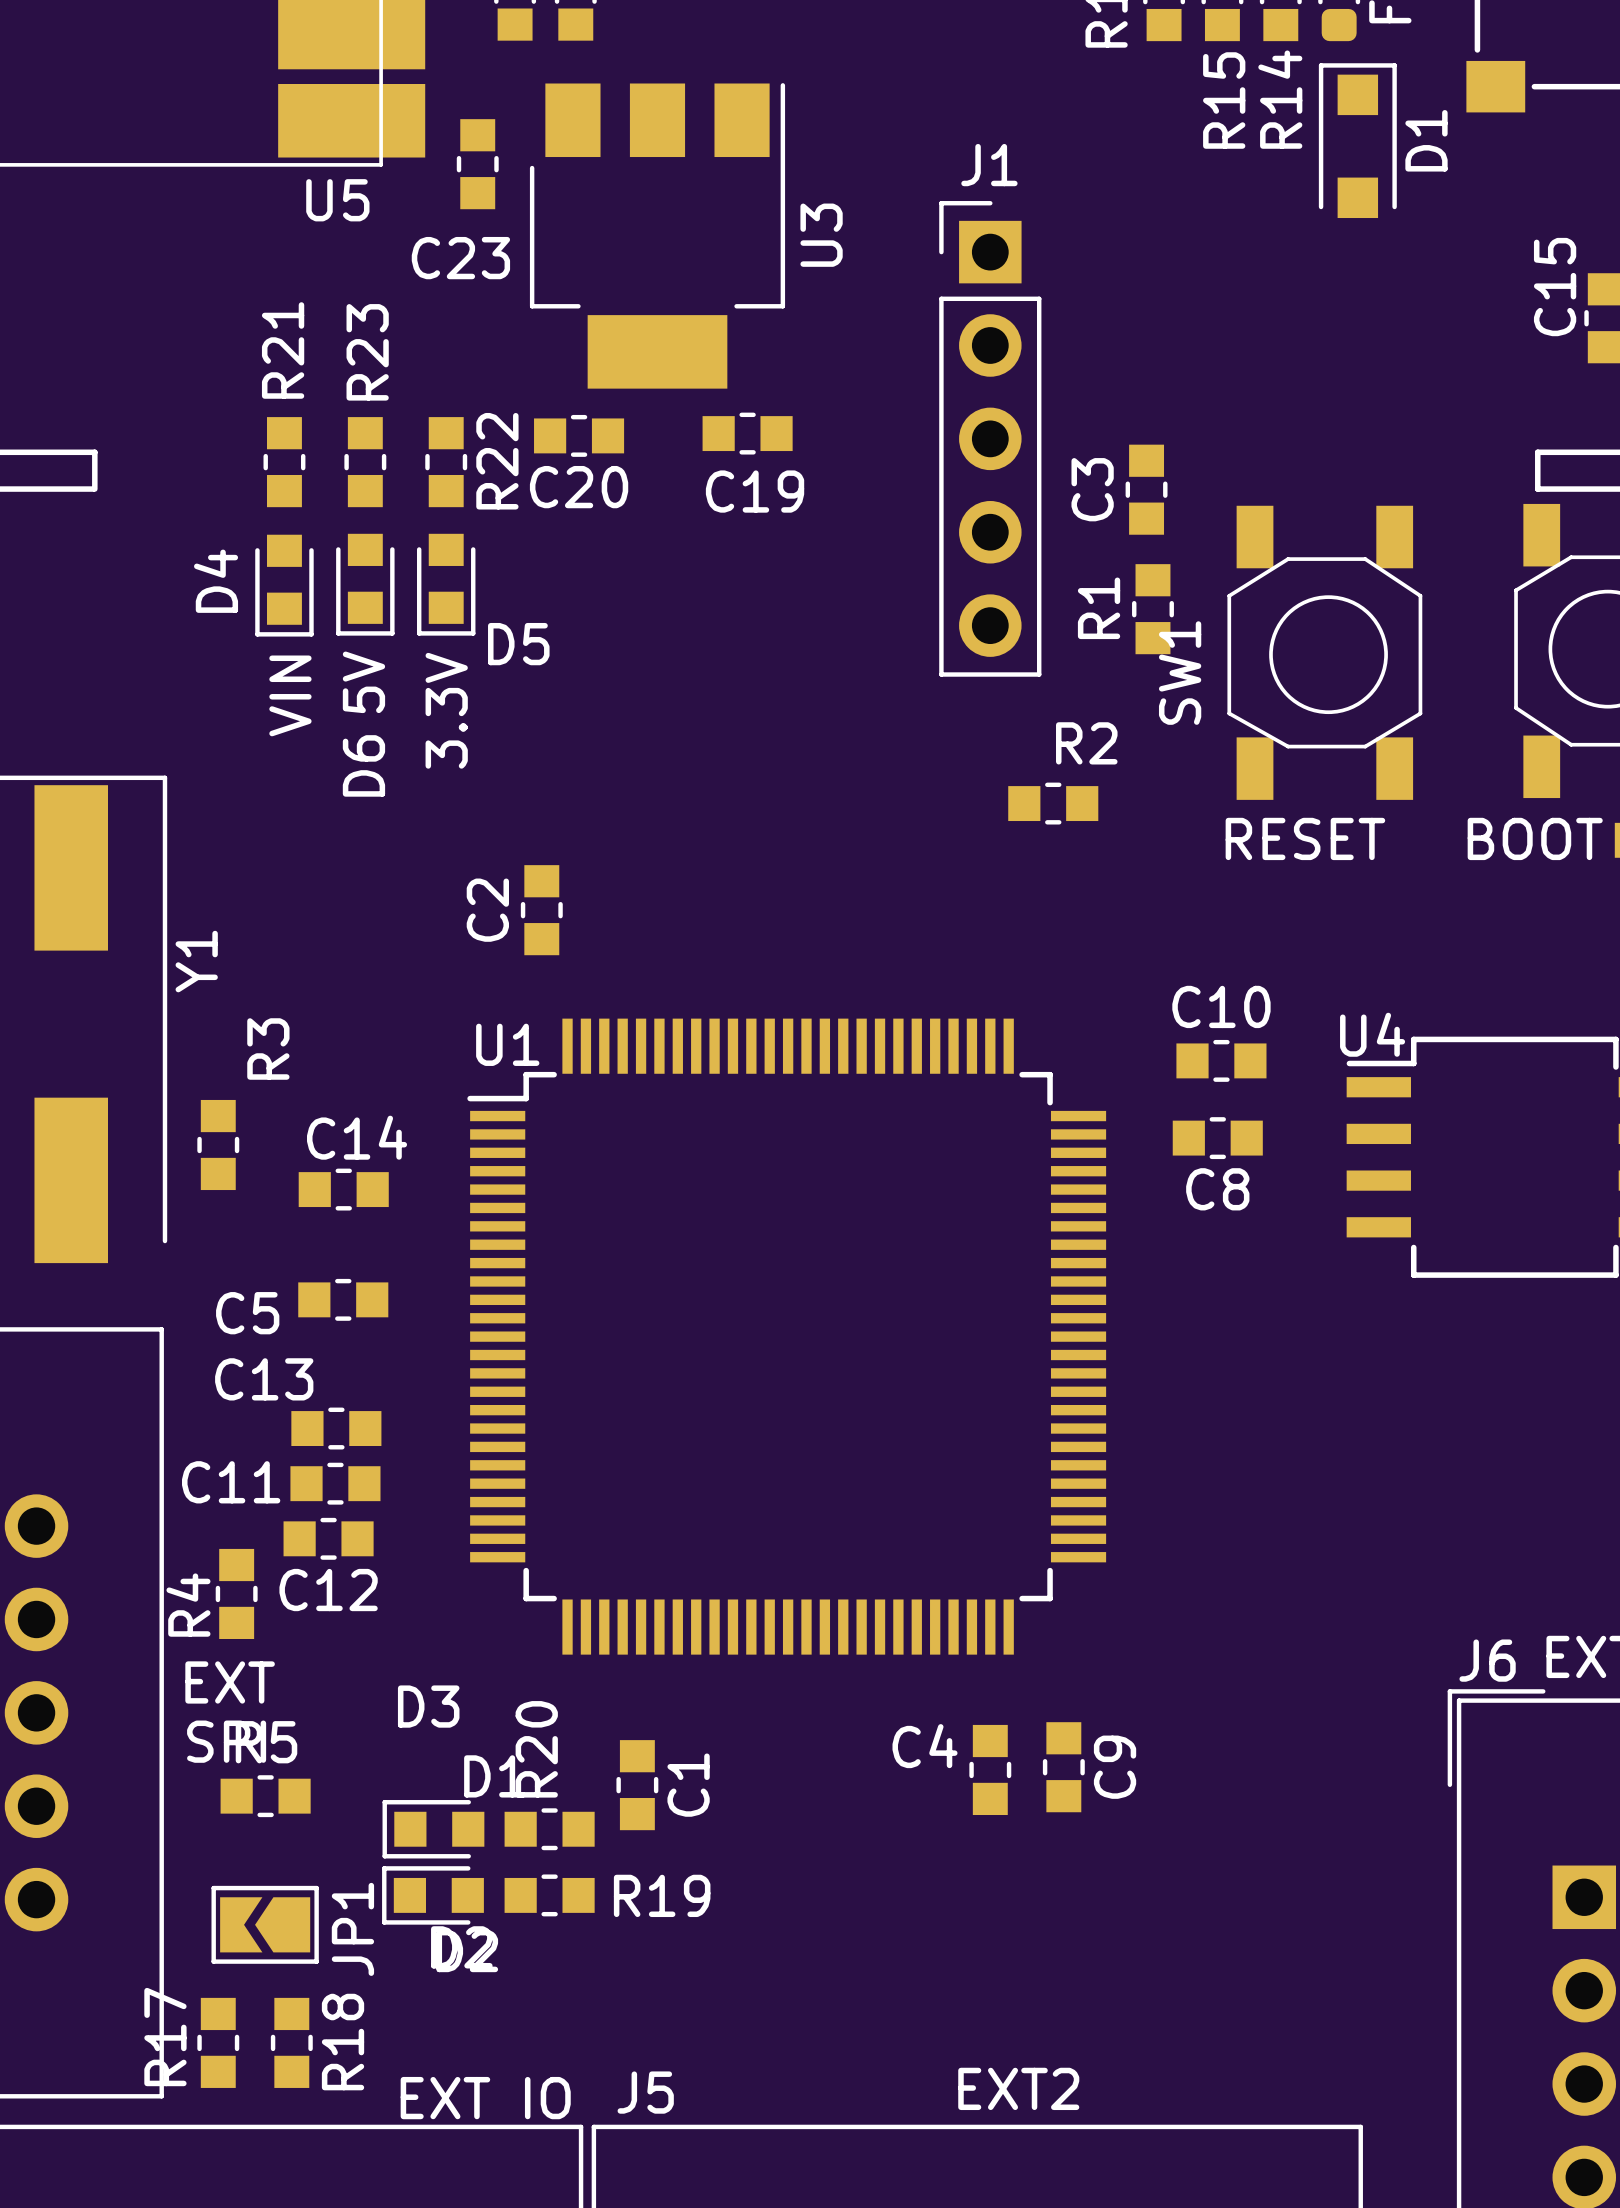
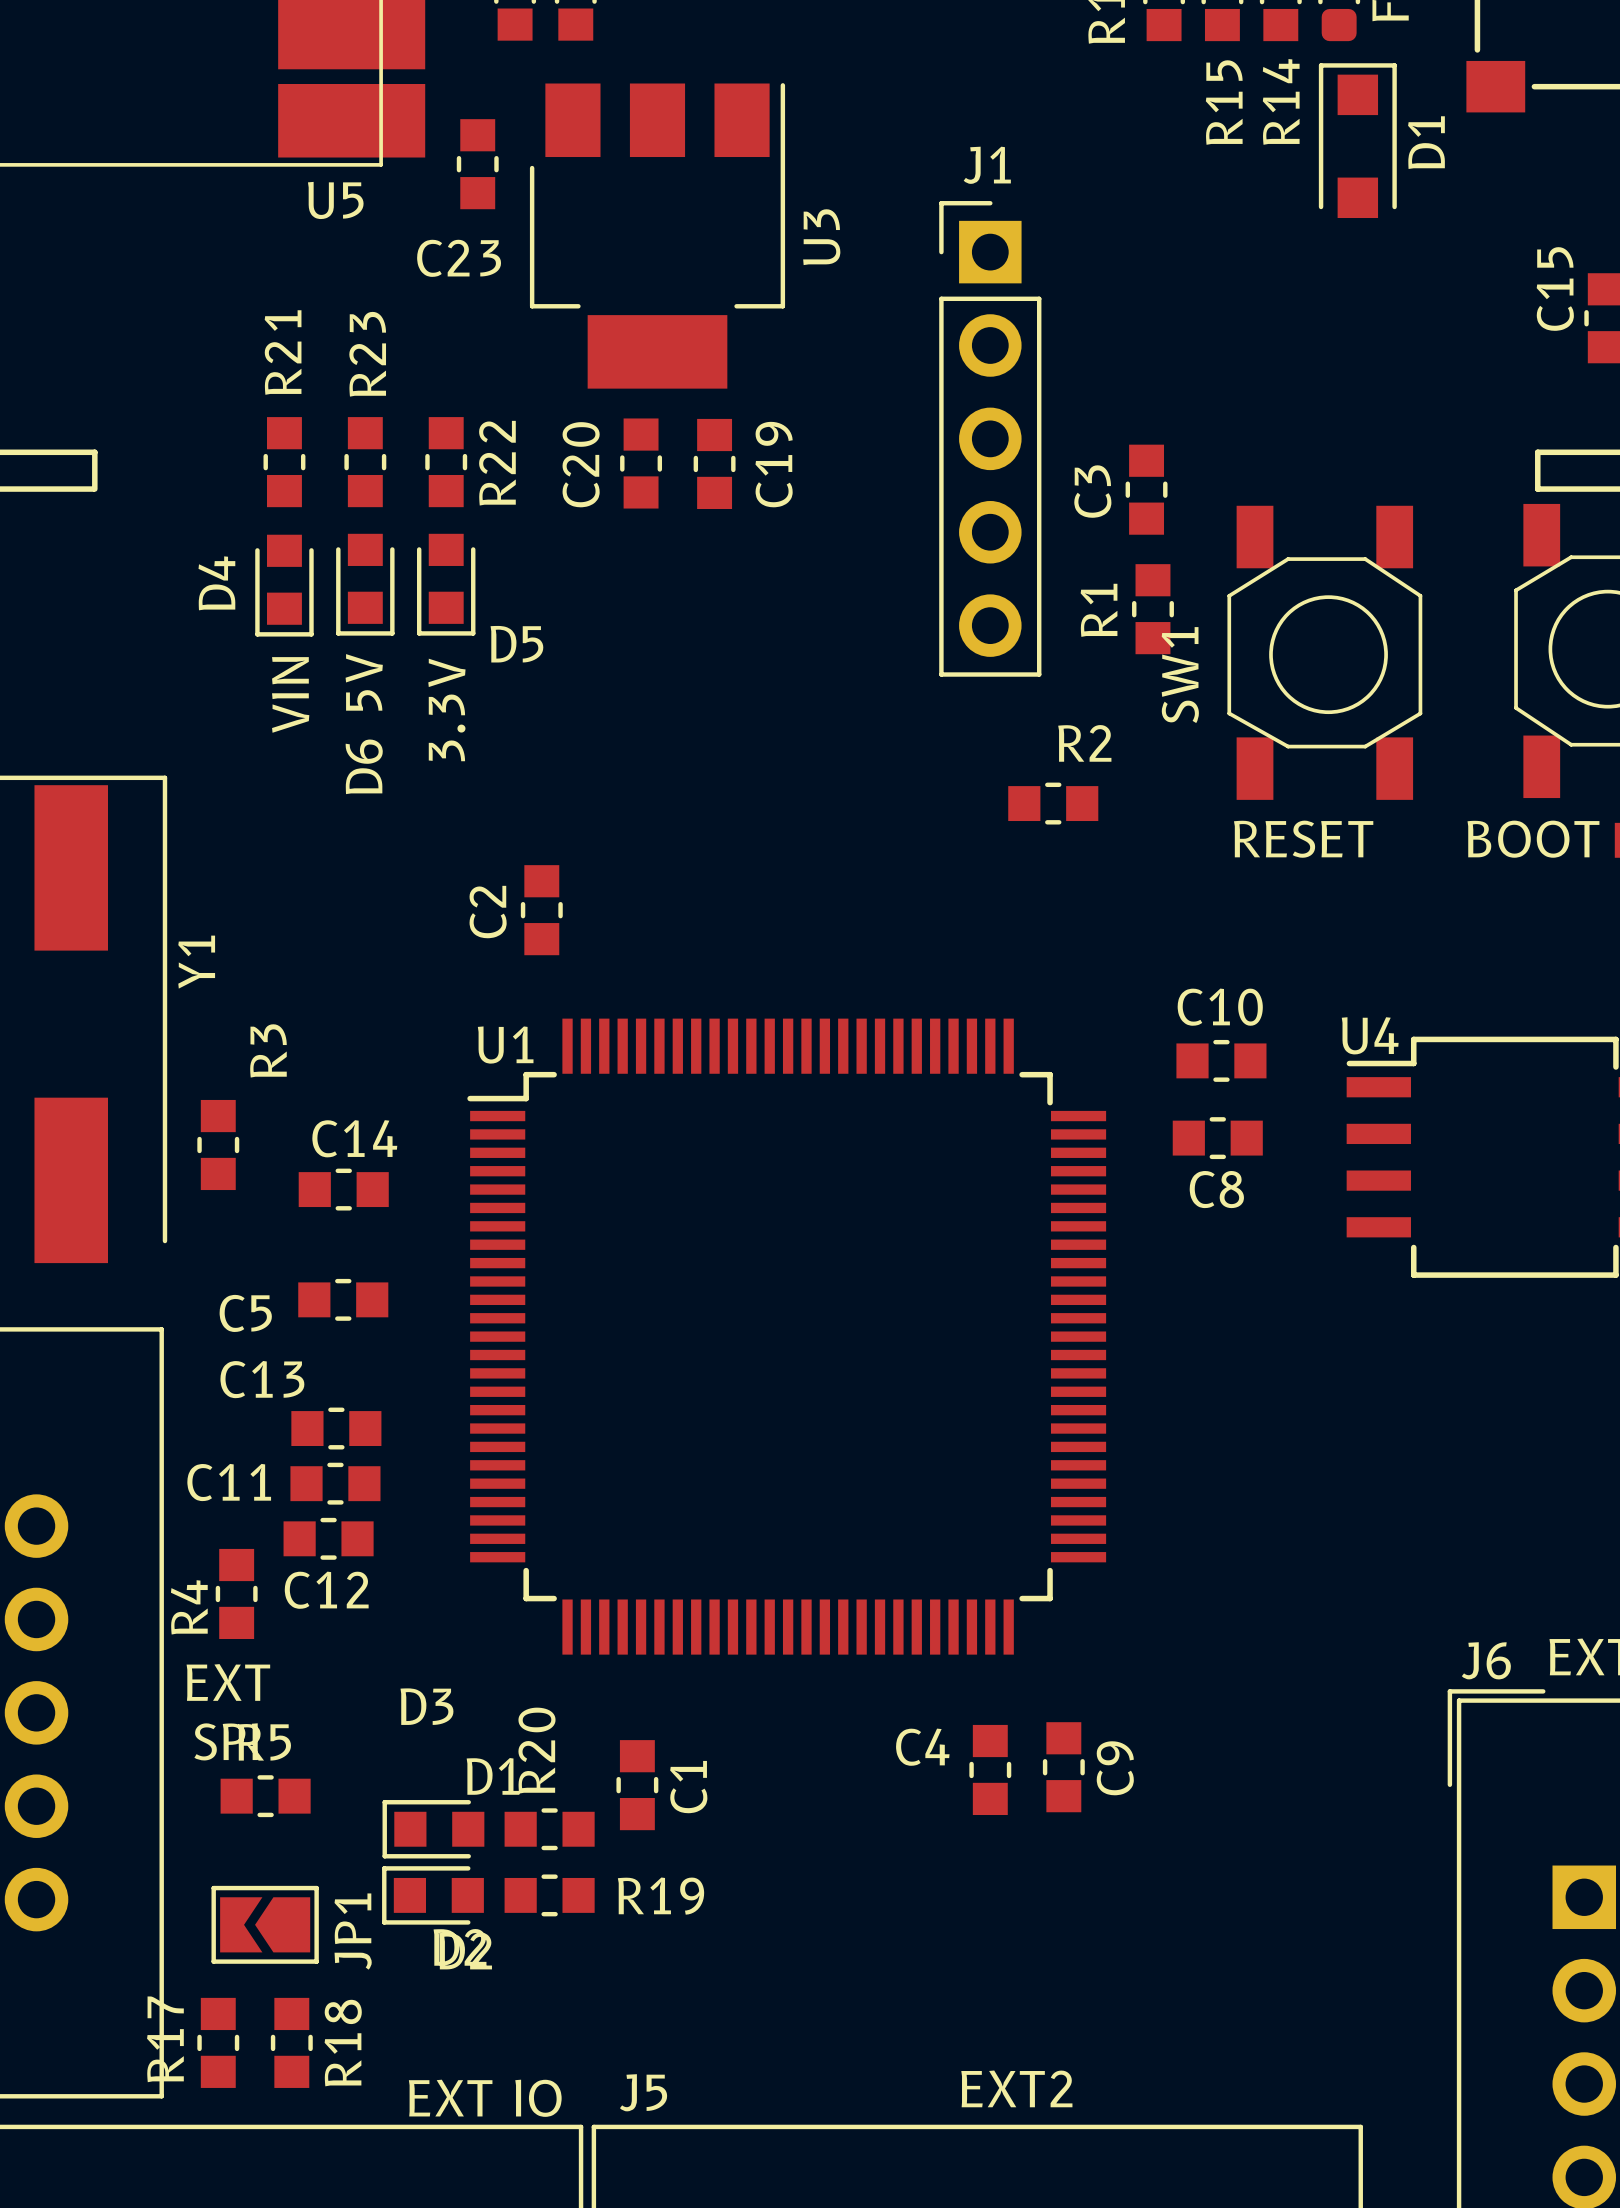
C19 rotation: 0° (747, 433) -> 90° clockwise (714, 463)
C20 rotation: 0° (579, 435) -> 90° clockwise (641, 463)
C20 position: (579, 435) -> (641, 463)
C19 name position: C19 (755, 491) -> C19 (774, 464)

